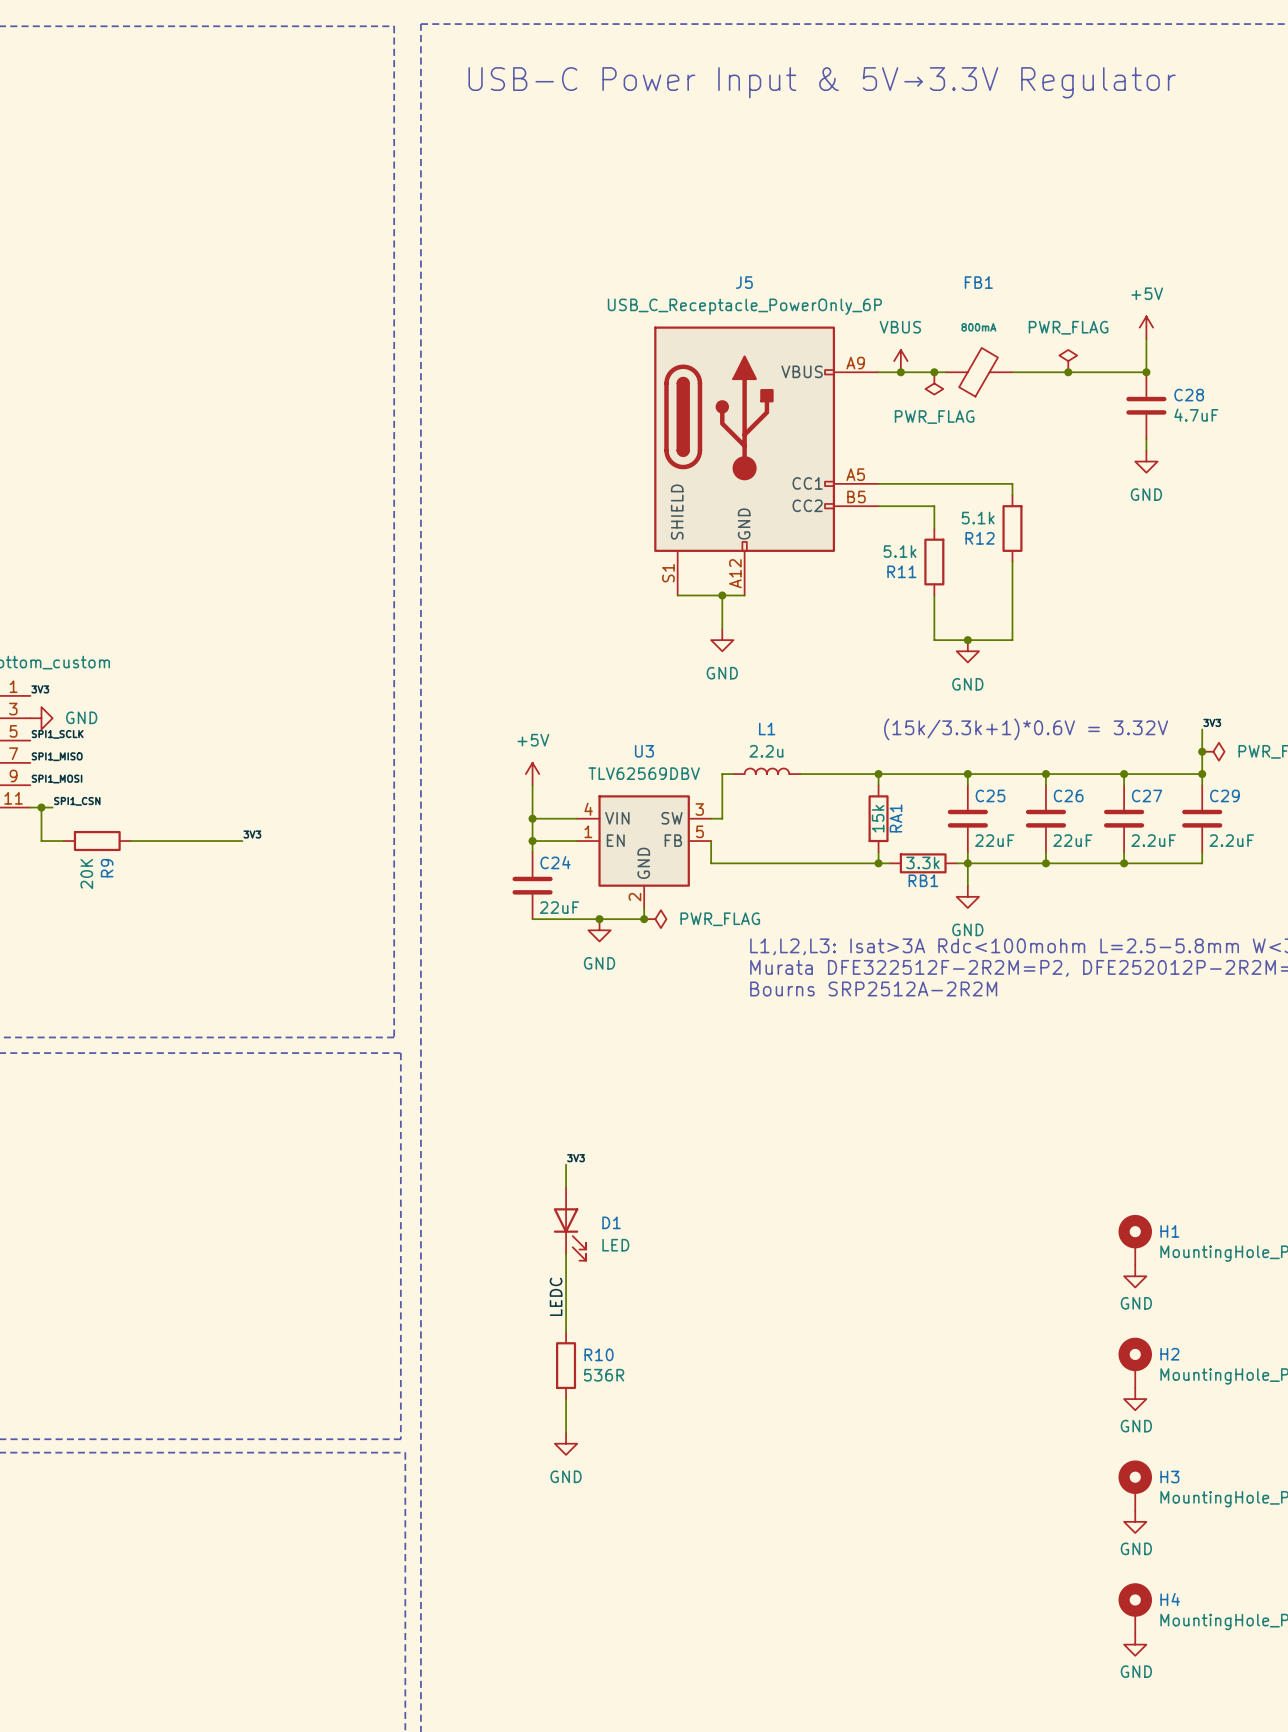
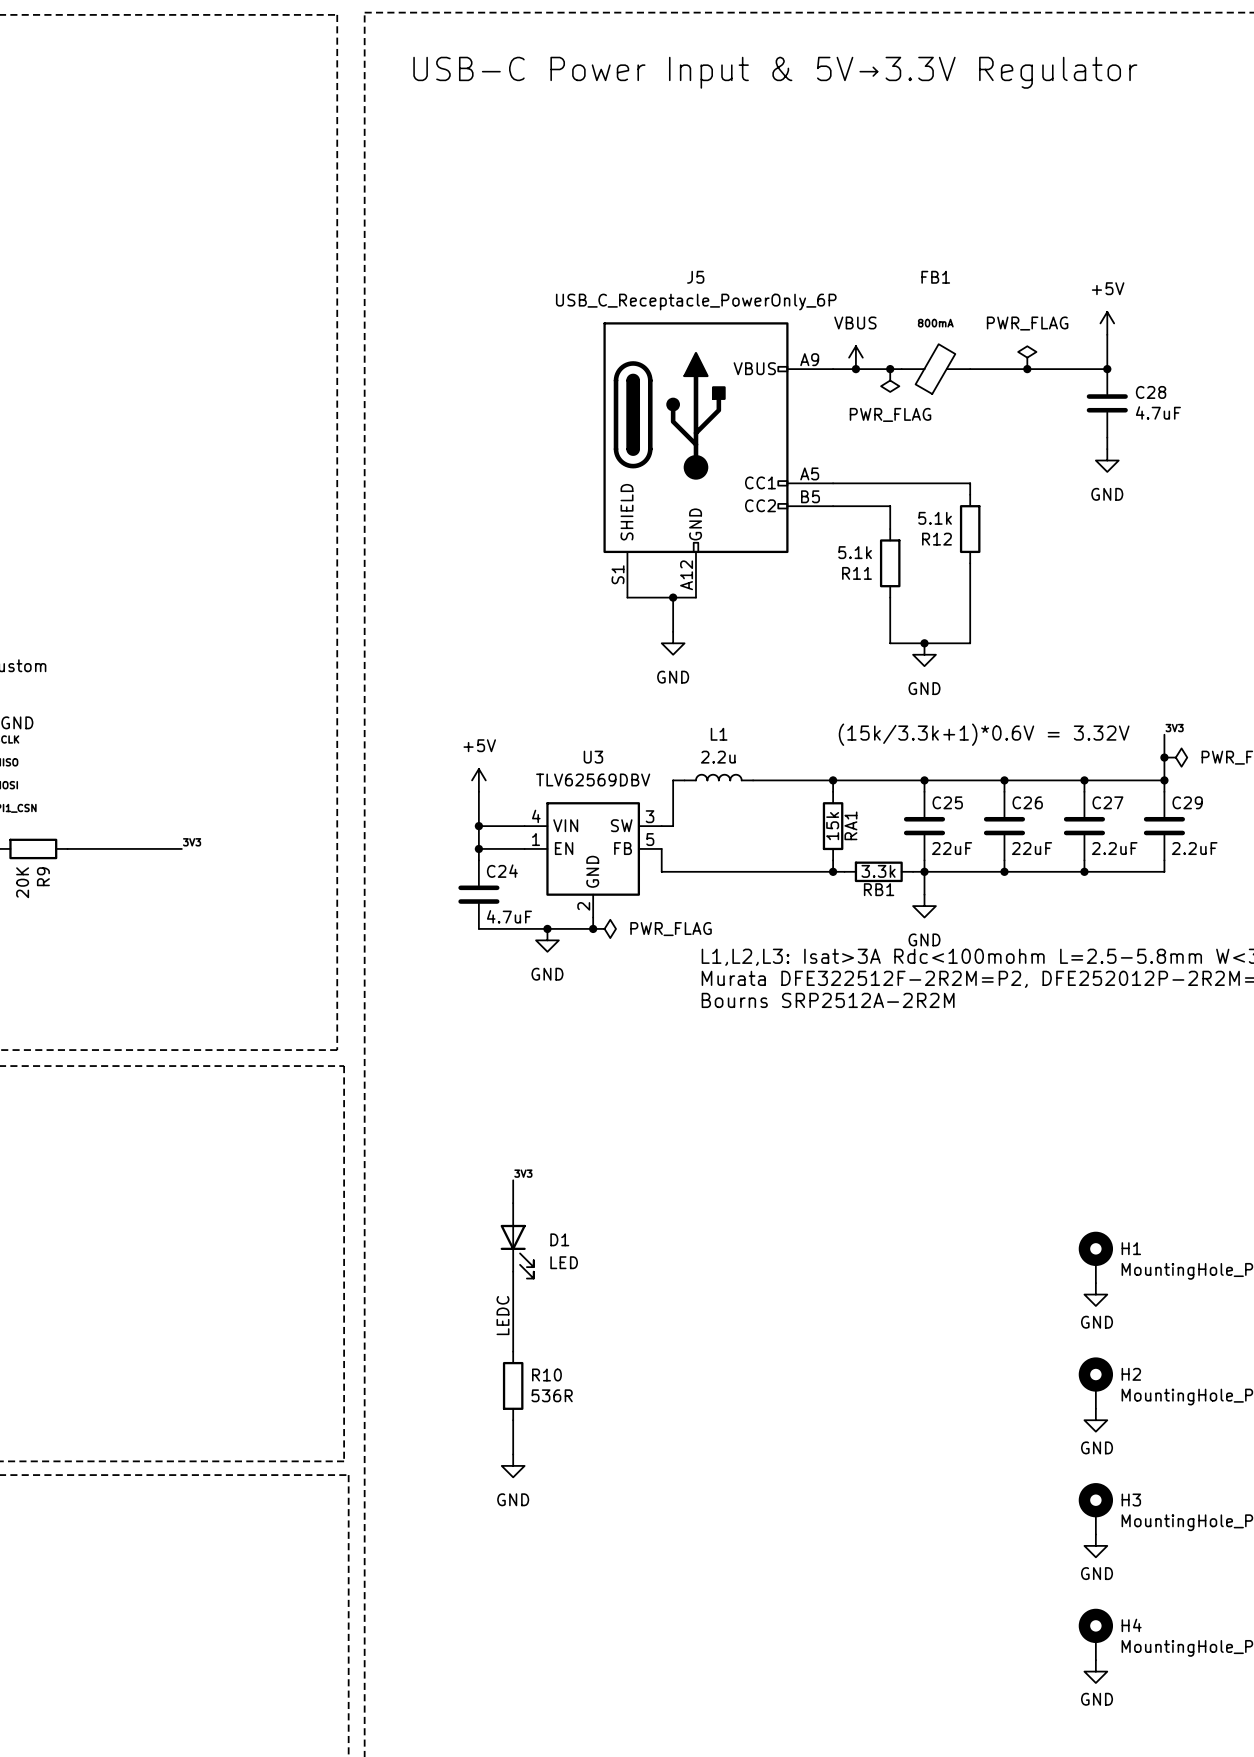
C24 value: 22uF (559, 907) -> 4.7uF (509, 916)

